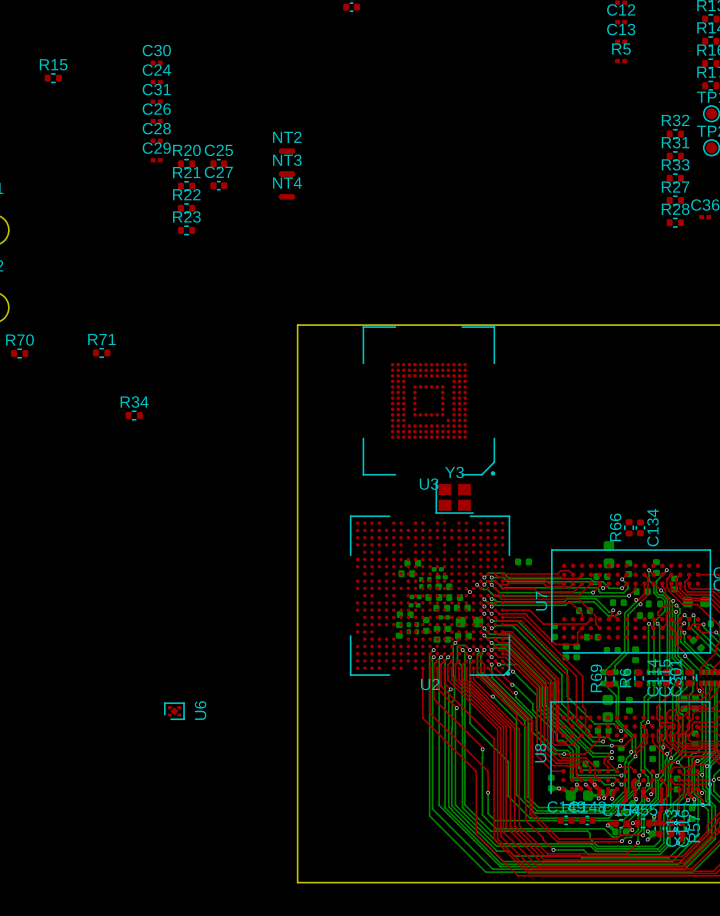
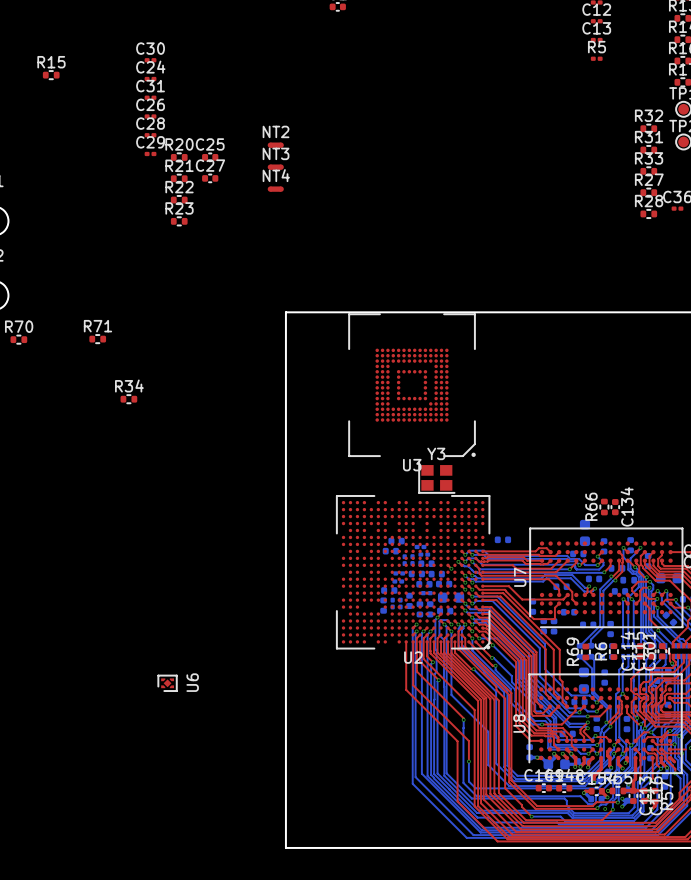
via: (713, 780) -> none
via: (702, 792) -> none

